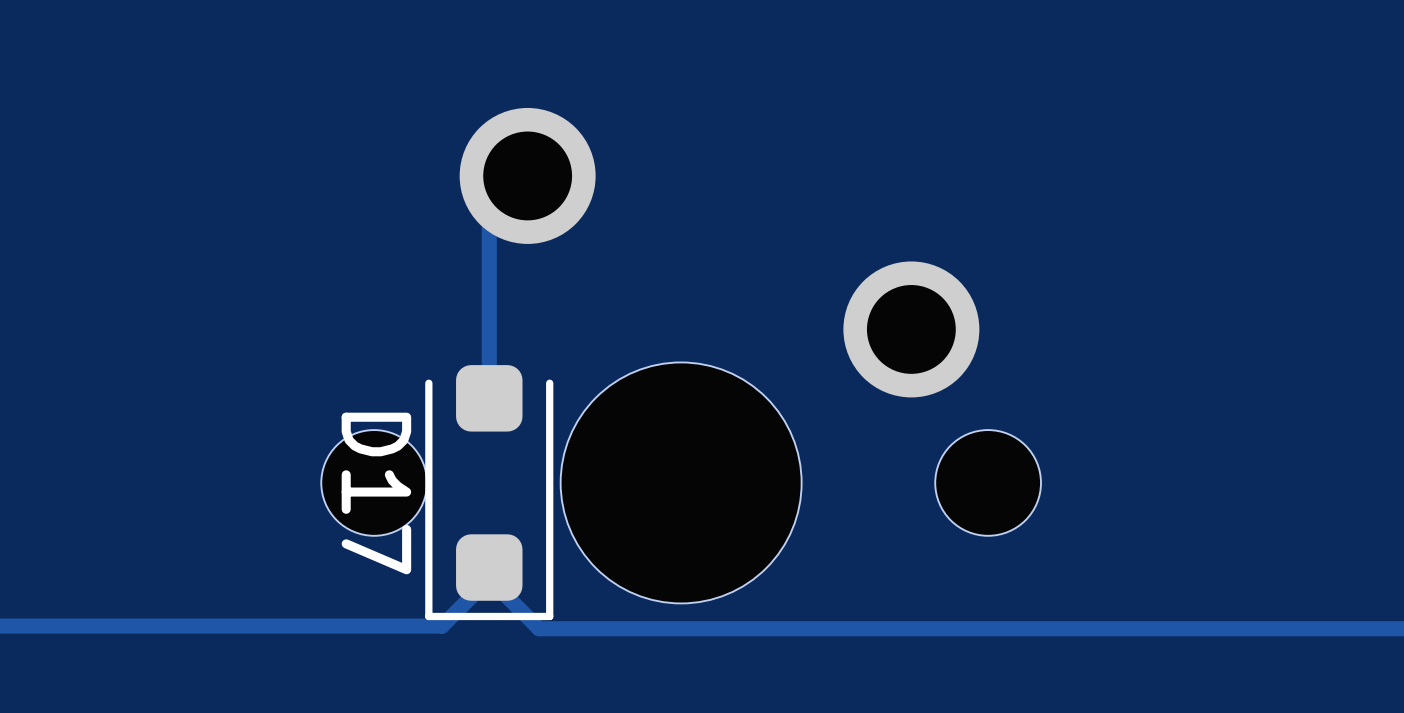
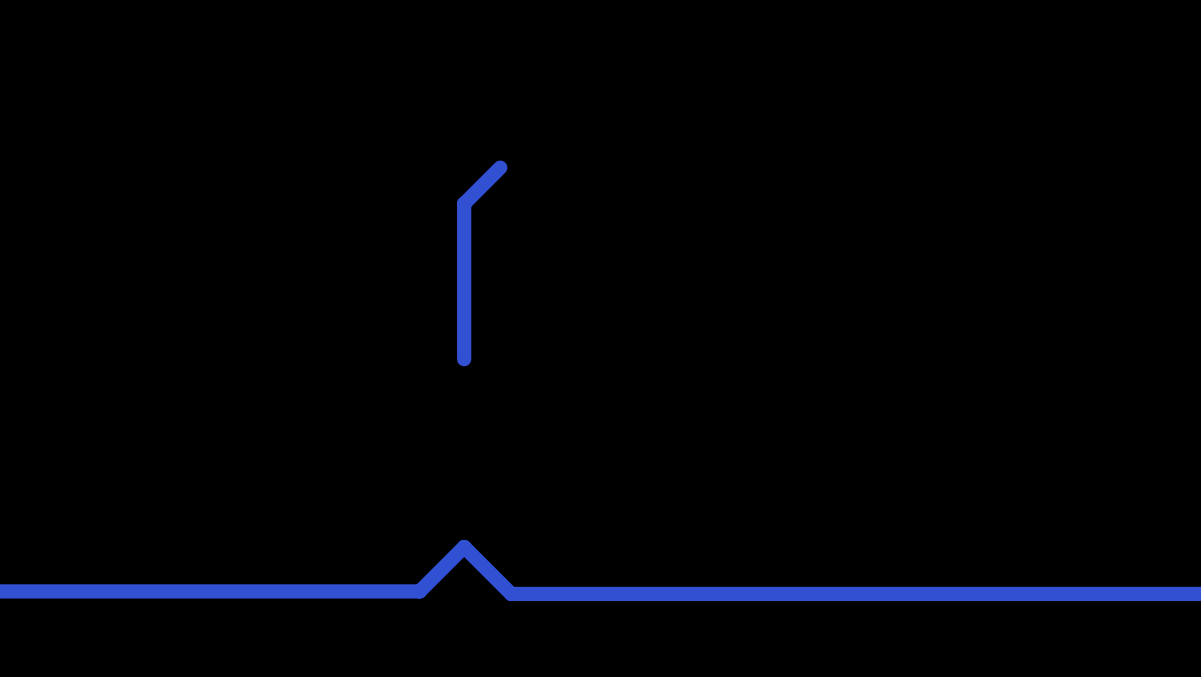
part: (681, 355) -> none
D17: (489, 492) -> none

